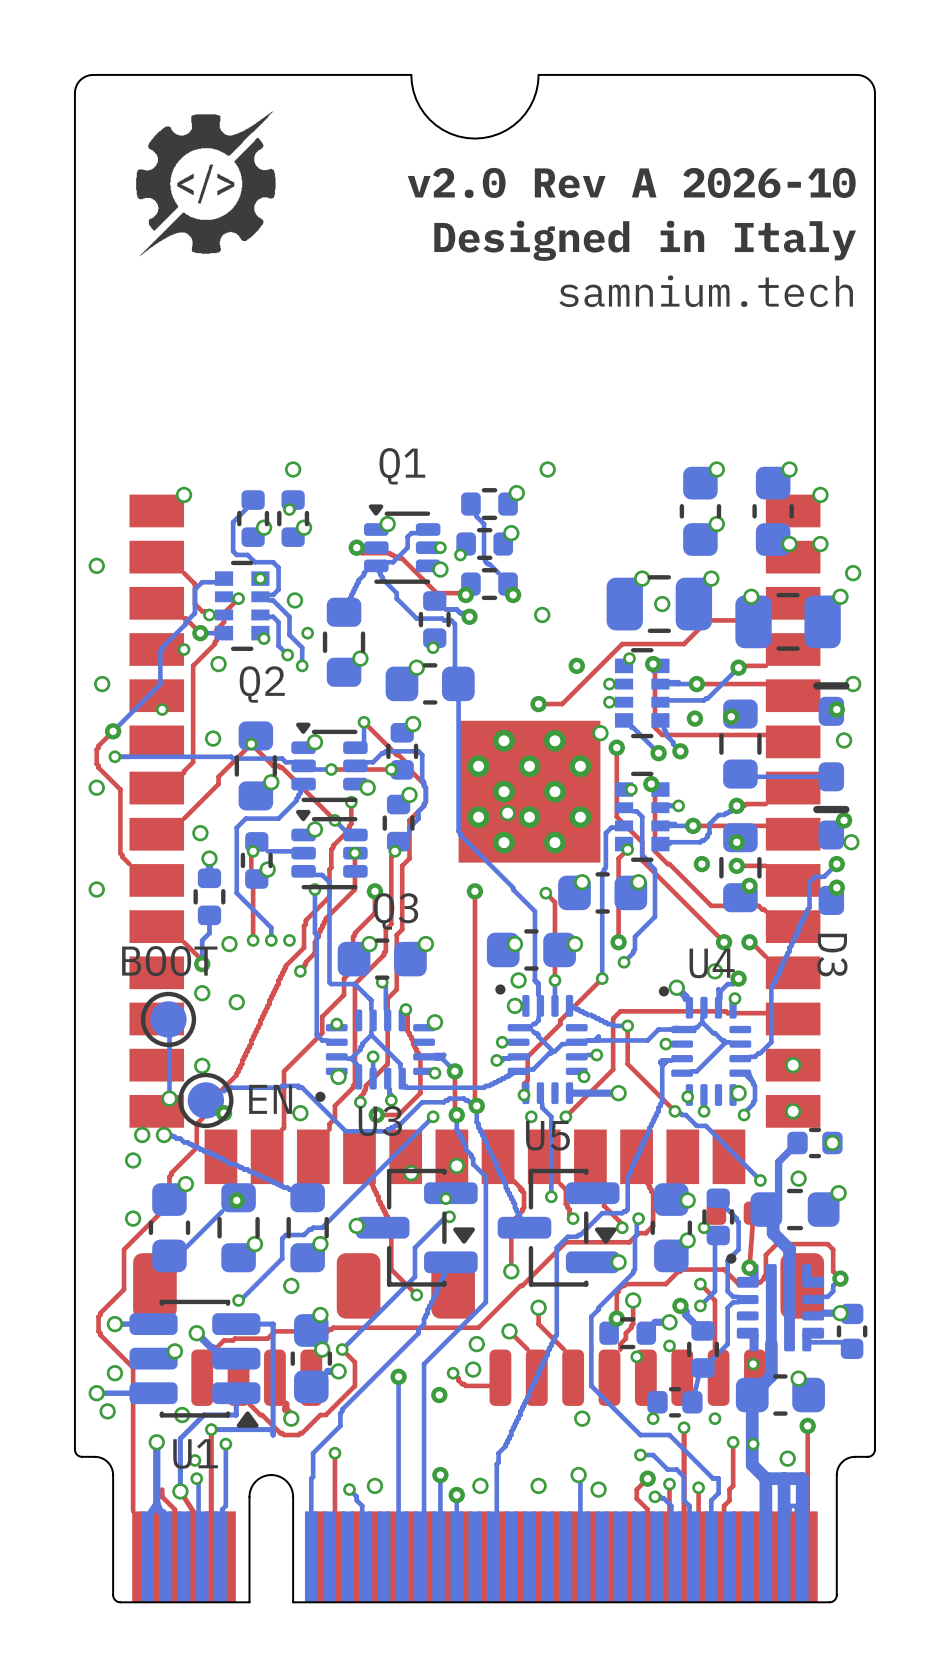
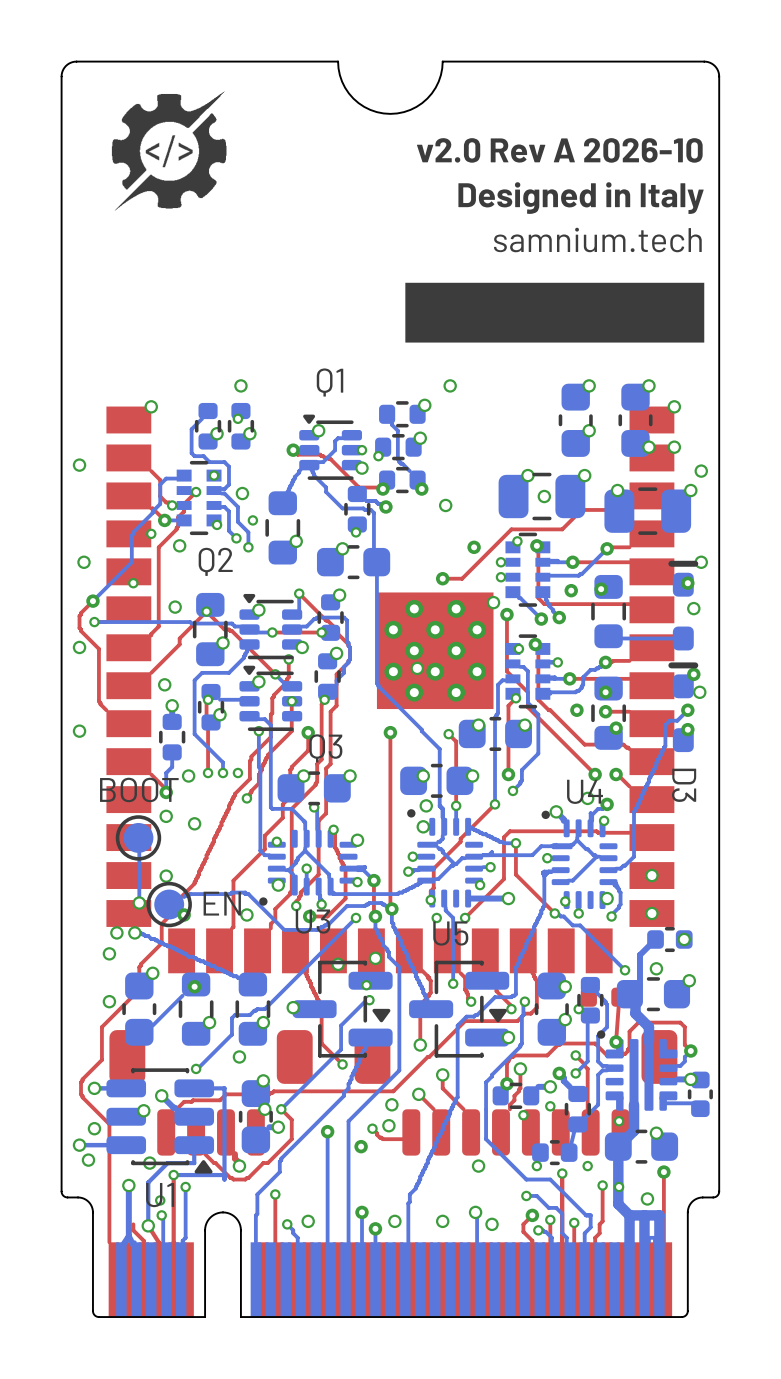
drawing: none -> [405, 282, 705, 343]

